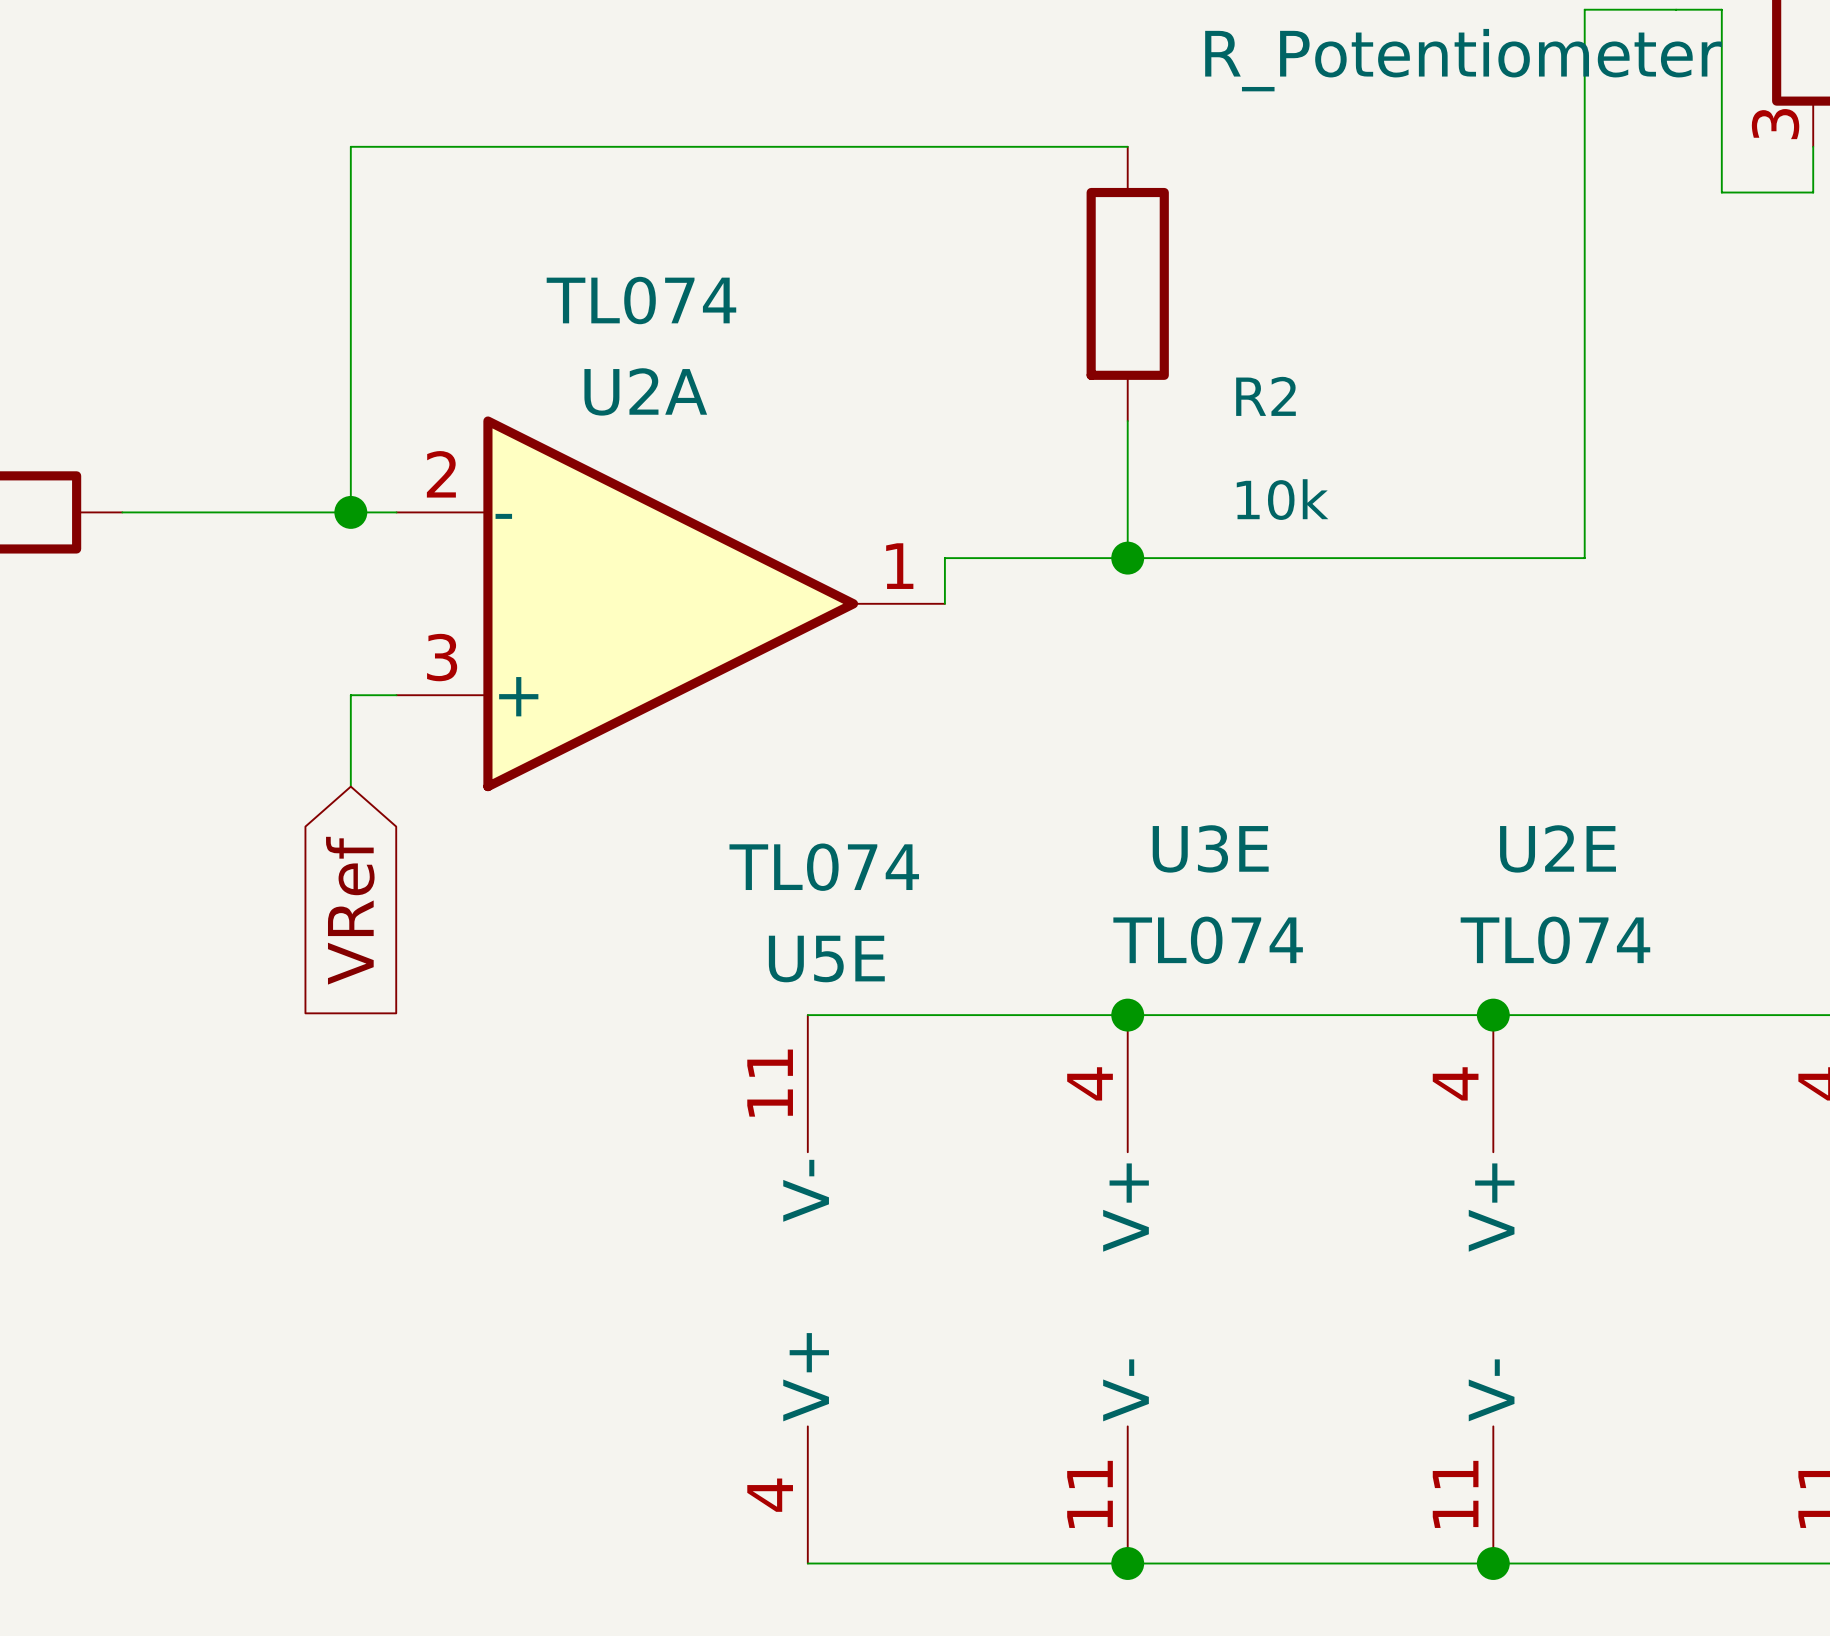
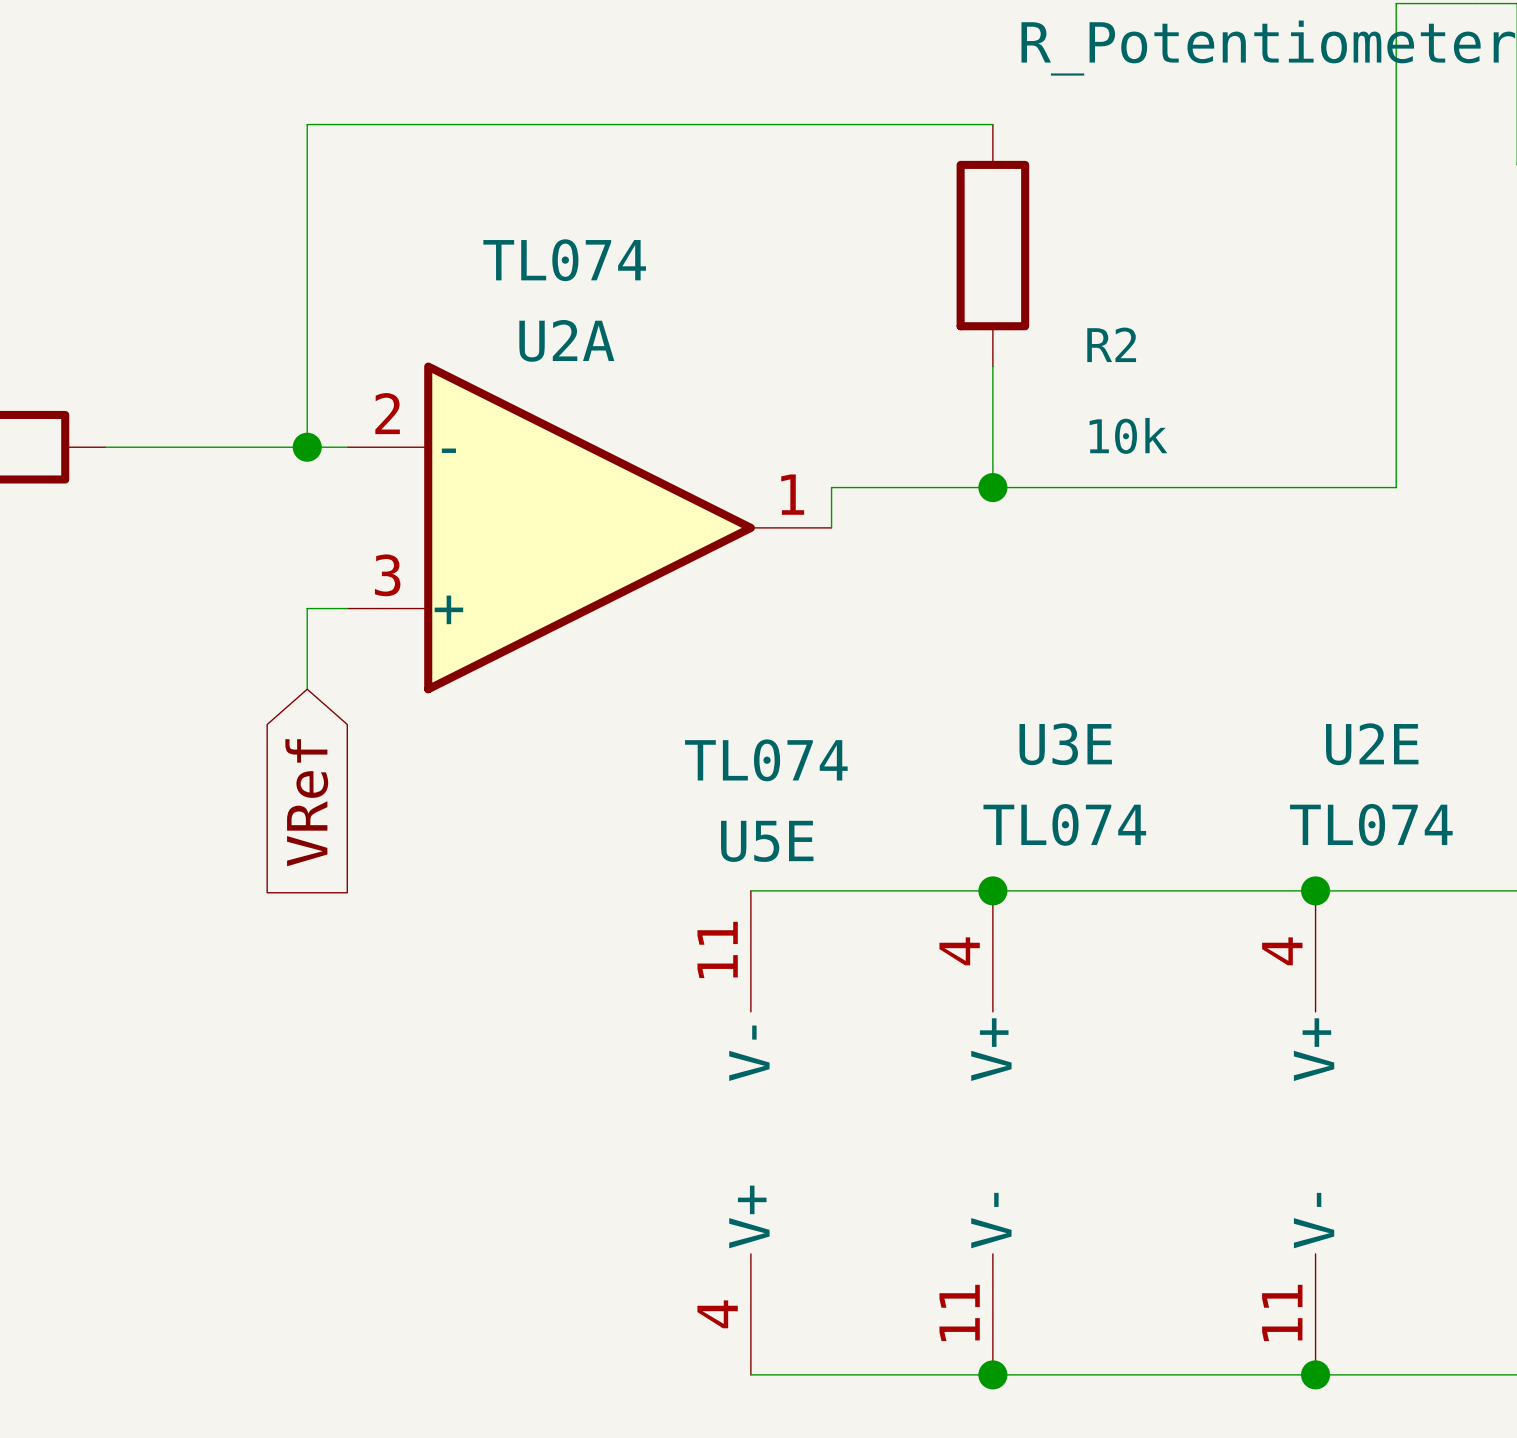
wire: (807, 1015) (853, 1015) -> none
U5E position: (807, 1289) -> (750, 1132)
wire: (807, 1563) (853, 1563) -> none

